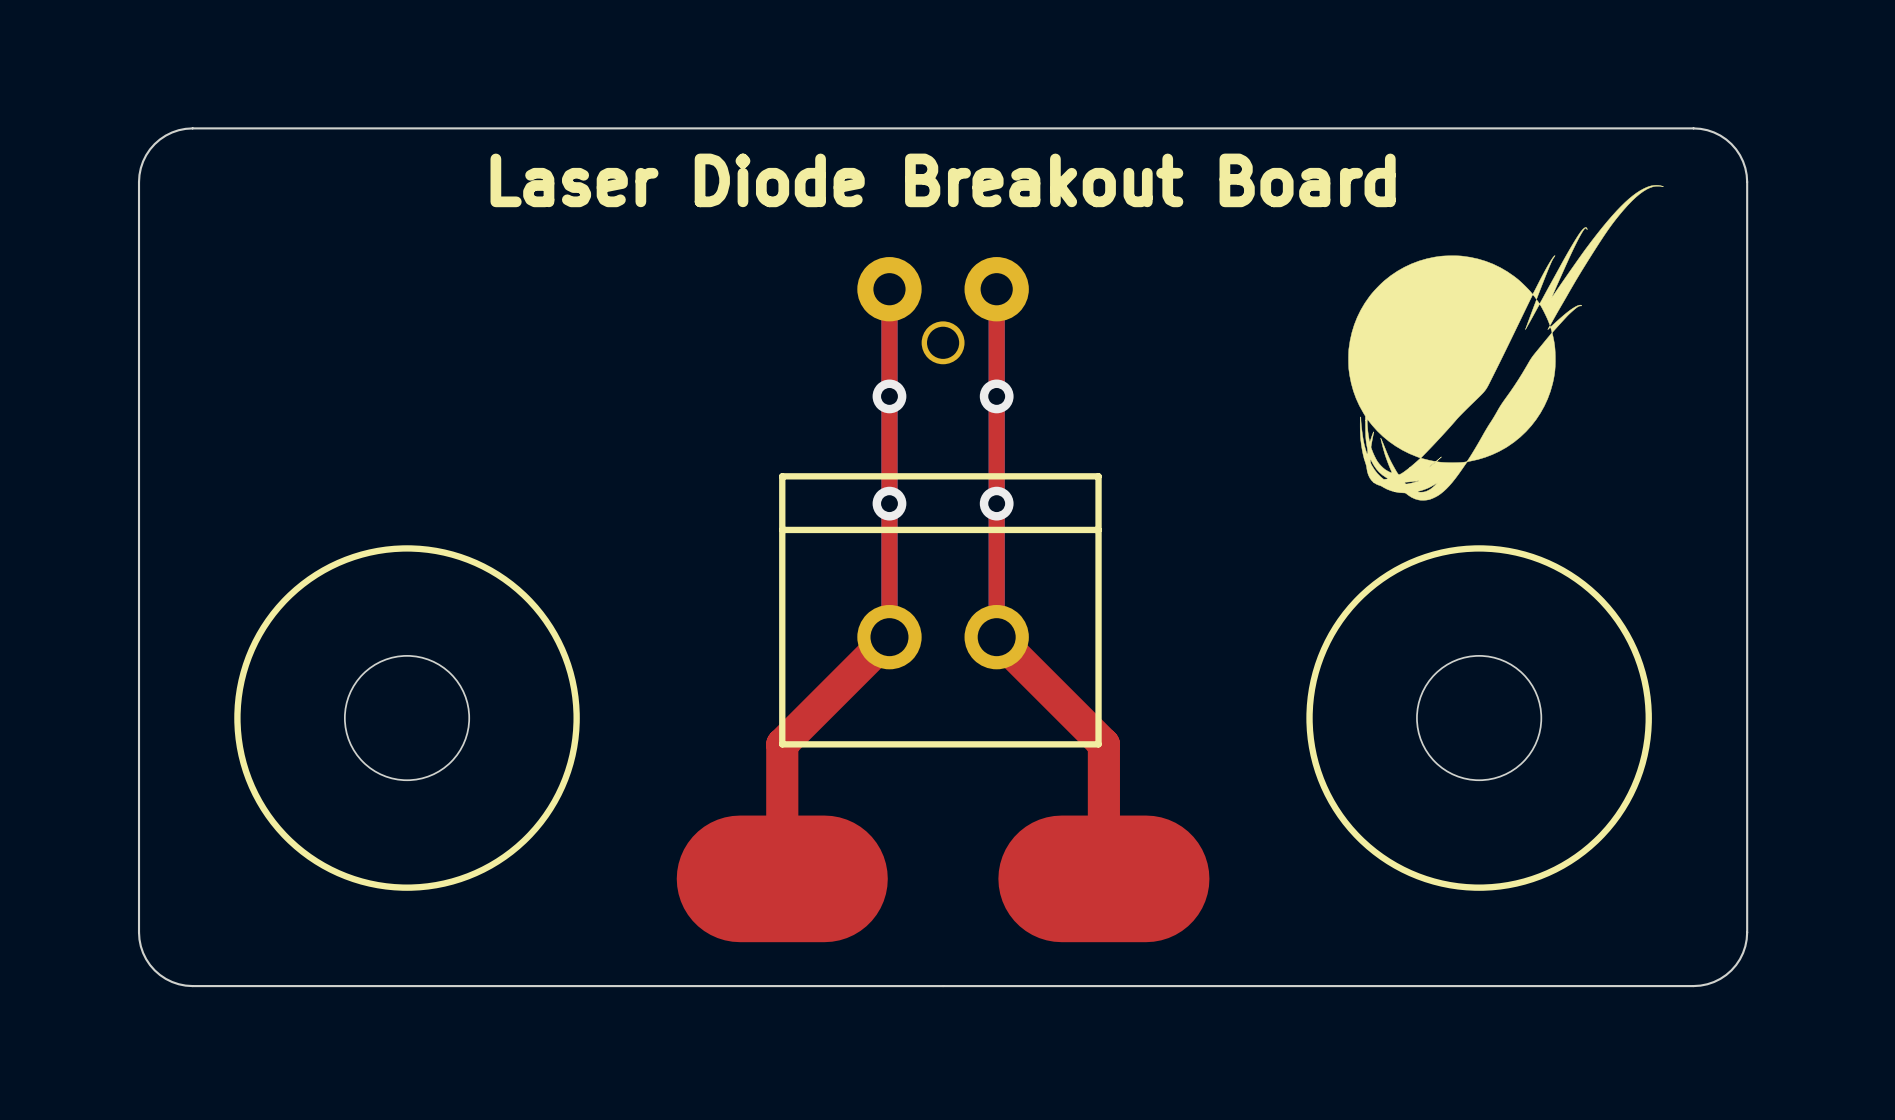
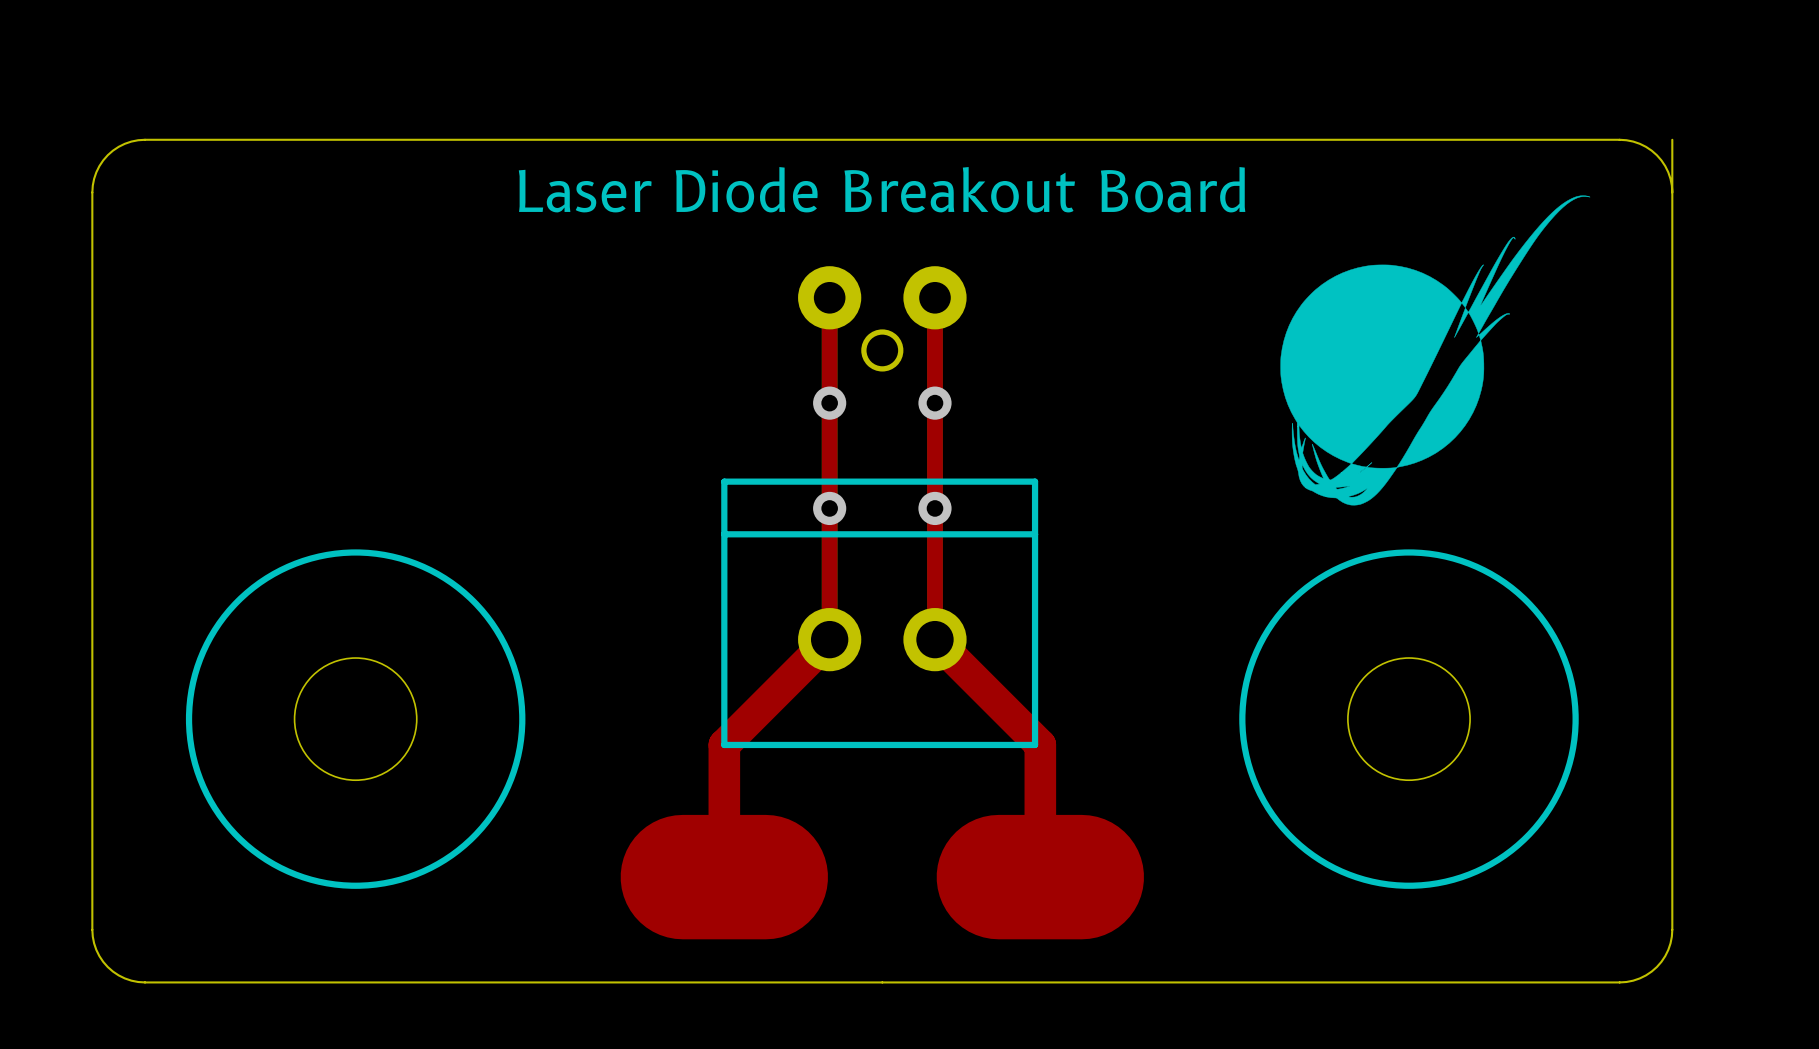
board edge: none -> (1672, 139) (1672, 192)

